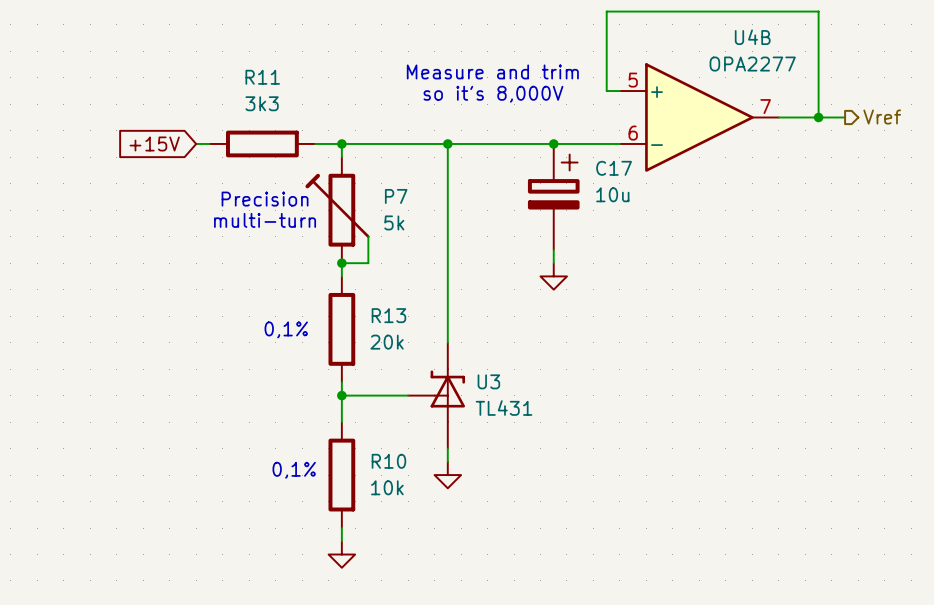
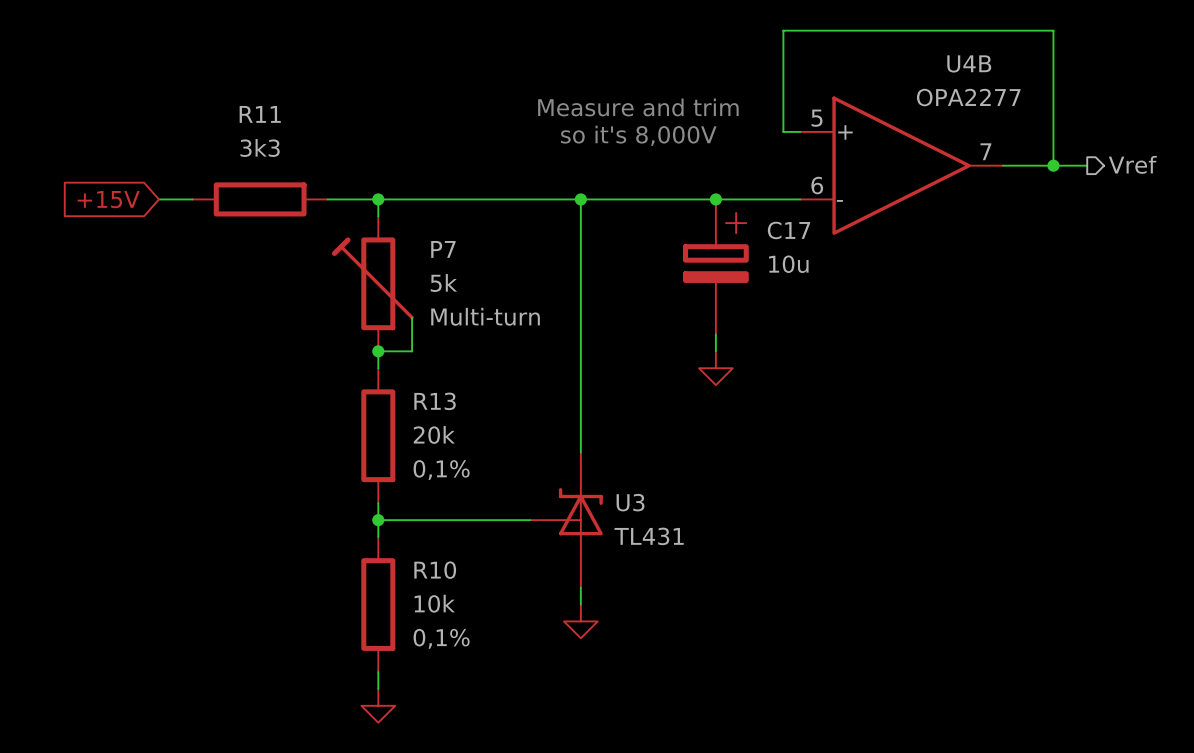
wire: none -> (158, 199) (192, 199)
global label position: +15V (154, 143) -> +15V (108, 199)
wire: (196, 143) (209, 143) -> none
wire: none -> (327, 199) (412, 199)
R11 position: (262, 143) -> (260, 199)
wire: (341, 143) (341, 157) -> (378, 199) (378, 216)
junction position: (341, 143) -> (378, 199)
P7 name position: P7 (396, 196) -> P7 (443, 249)
text: Precision (265, 199) -> none
P7 position: (337, 210) -> (372, 283)
text: multi-turn (265, 220) -> none
P7 value position: 5k (394, 222) -> 5k (443, 283)
wire: (368, 236) (368, 263) (341, 263) (341, 276) -> (412, 317) (412, 351) (378, 351) (378, 368)
P7 text: none -> Multi-turn (485, 316)
junction position: (341, 263) -> (378, 351)
R13 name position: R13 (388, 315) -> R13 (435, 401)
text: 0,1% (286, 329) -> none
R13 position: (341, 329) -> (378, 435)
R13 value position: 20k (387, 342) -> 20k (434, 434)
R13 text: none -> 0,1% (441, 470)
wire: none -> (378, 503) (378, 537)
wire: (341, 382) (341, 422) -> none
wire: none -> (378, 520) (445, 520)
junction position: (341, 395) -> (378, 520)
R10 name position: R10 (388, 461) -> R10 (435, 570)
text: 0,1% (294, 470) -> none
R10 position: (341, 475) -> (378, 604)
R10 value position: 10k (387, 487) -> 10k (434, 603)
R10 text: none -> 0,1% (441, 638)
wire: (341, 528) (341, 541) -> (378, 672) (378, 688)
power symbol position: (341, 554) -> (378, 705)

